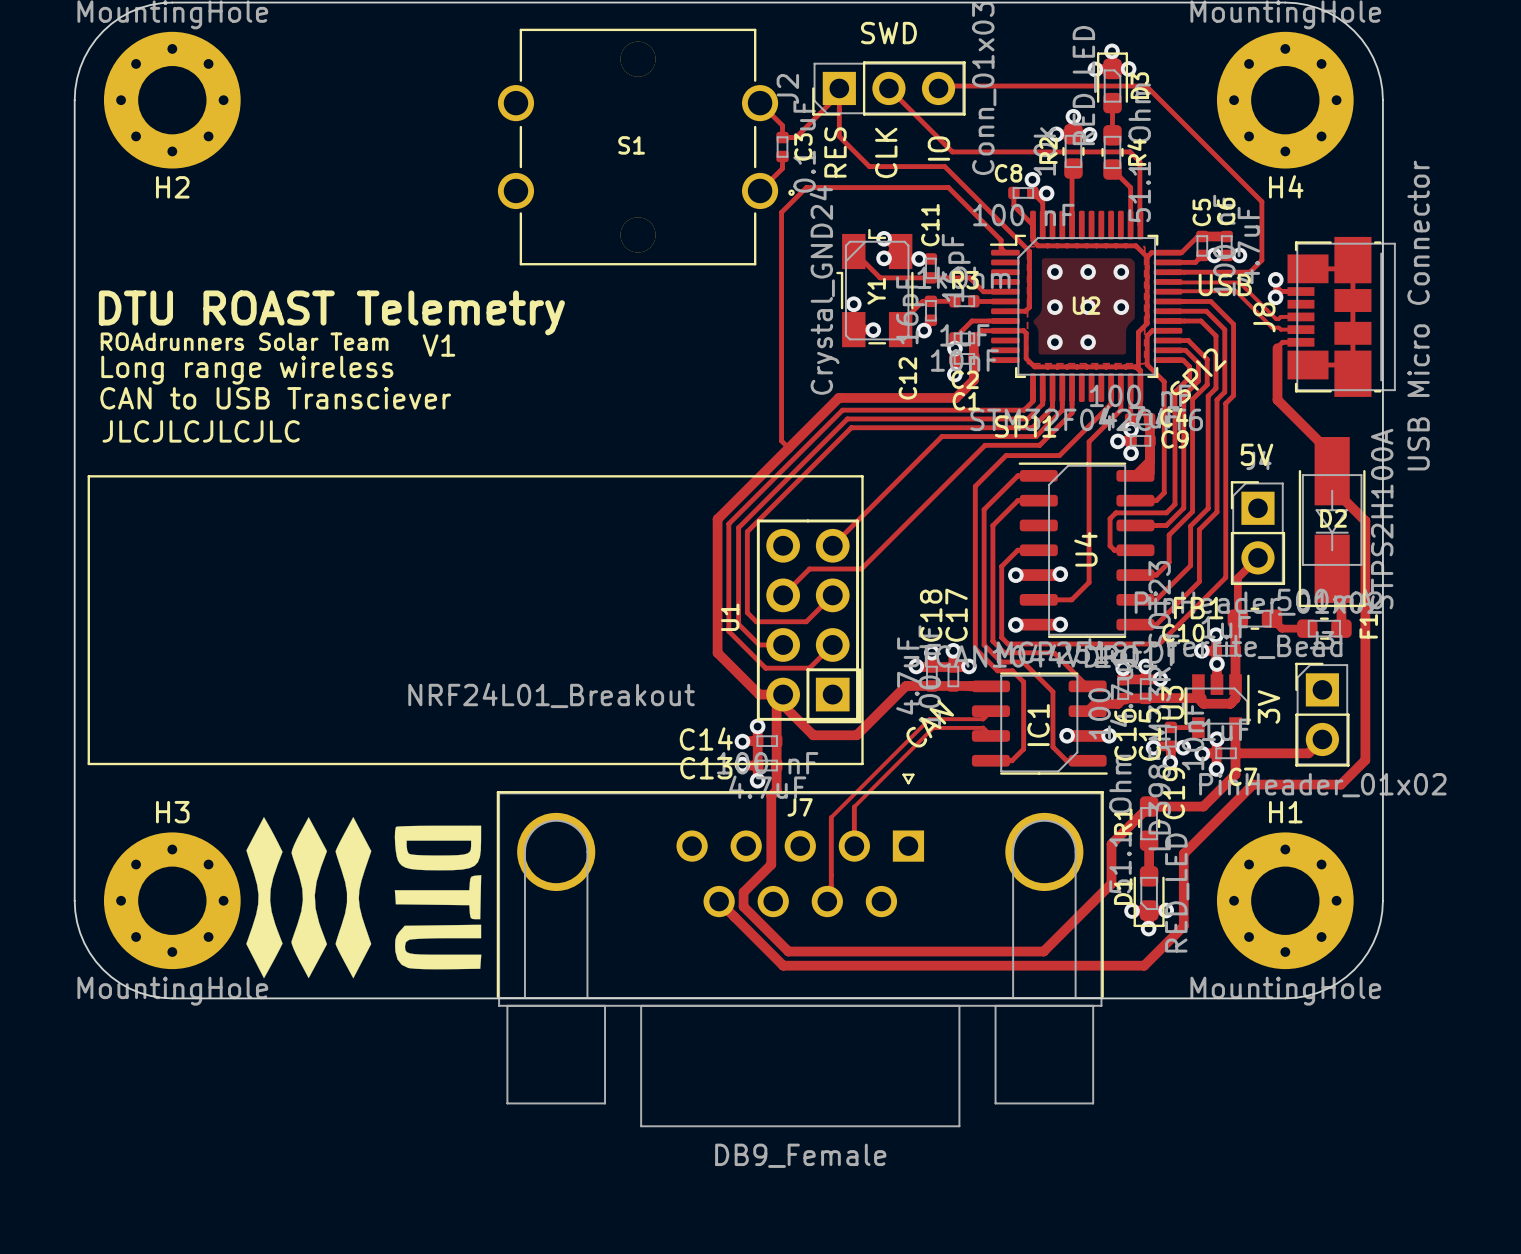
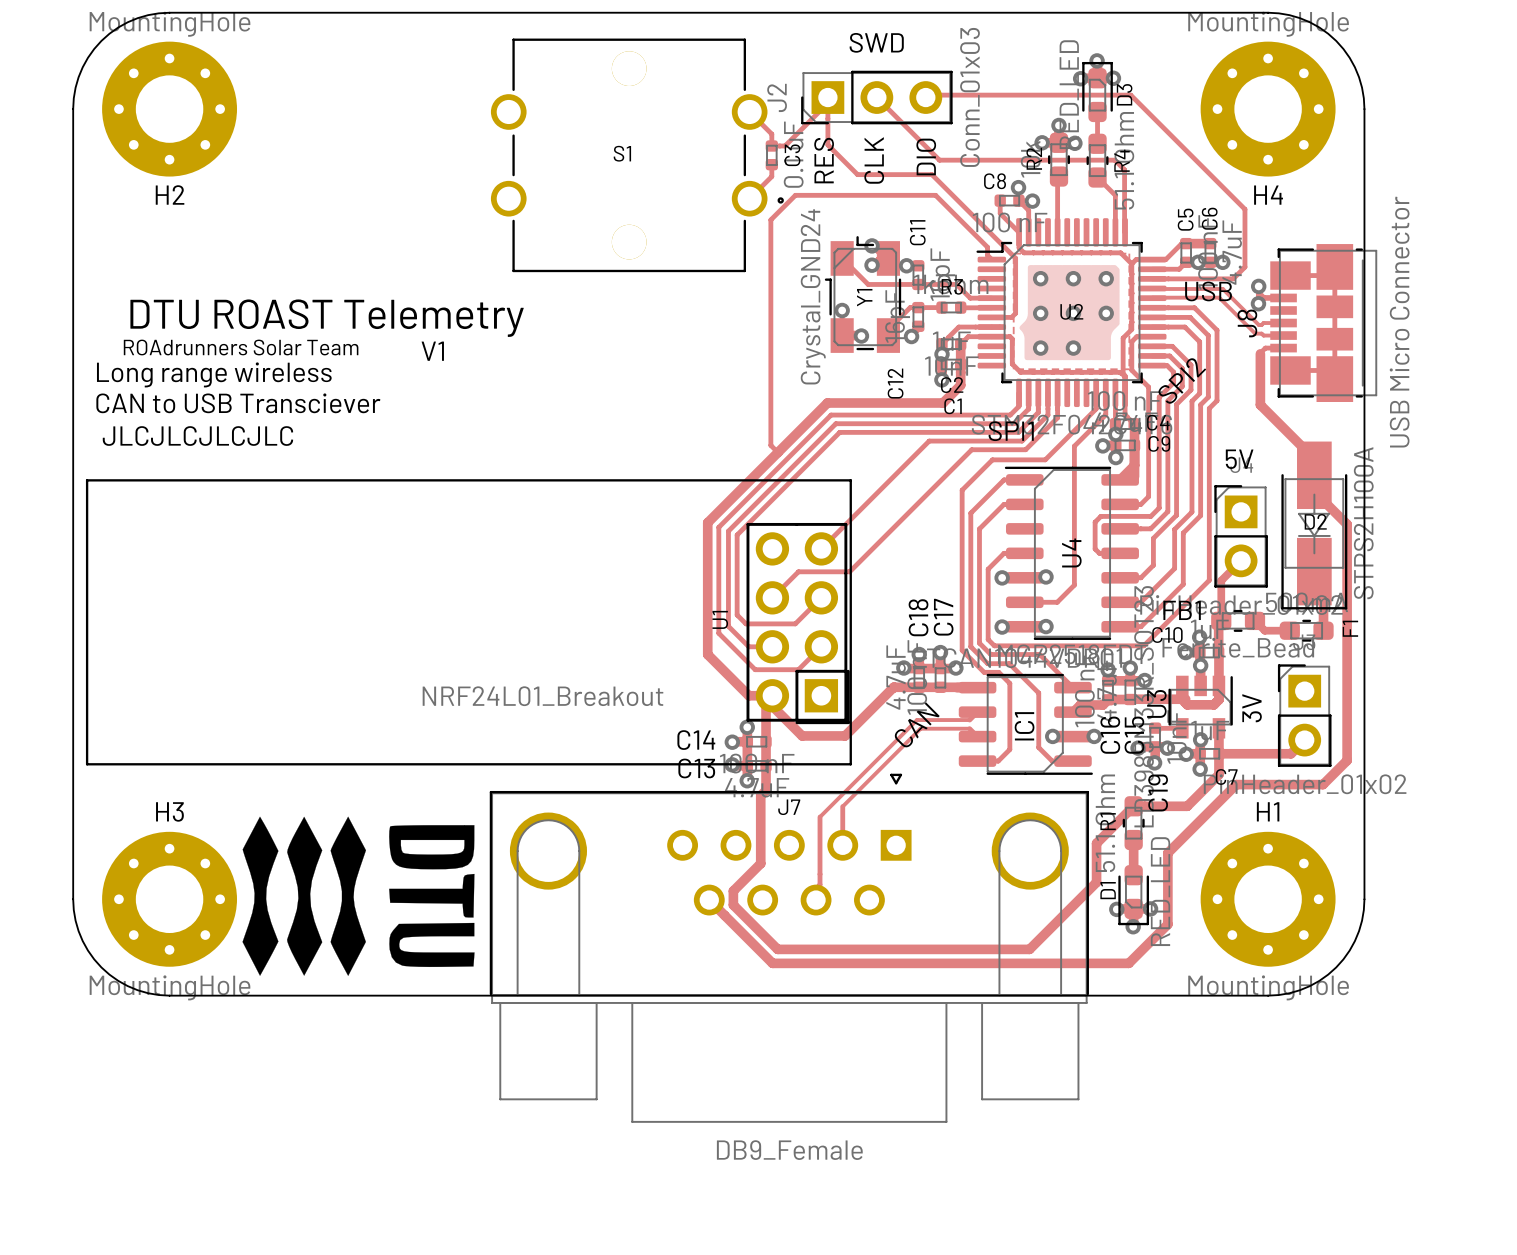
text: IO (938, 148) -> DIO (926, 156)

